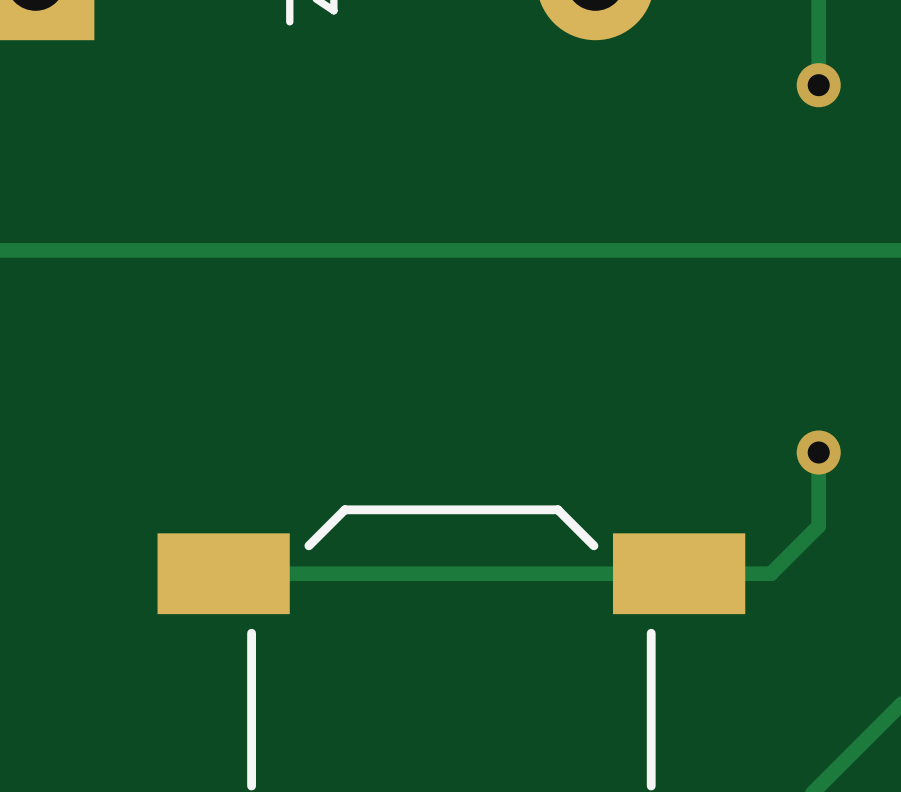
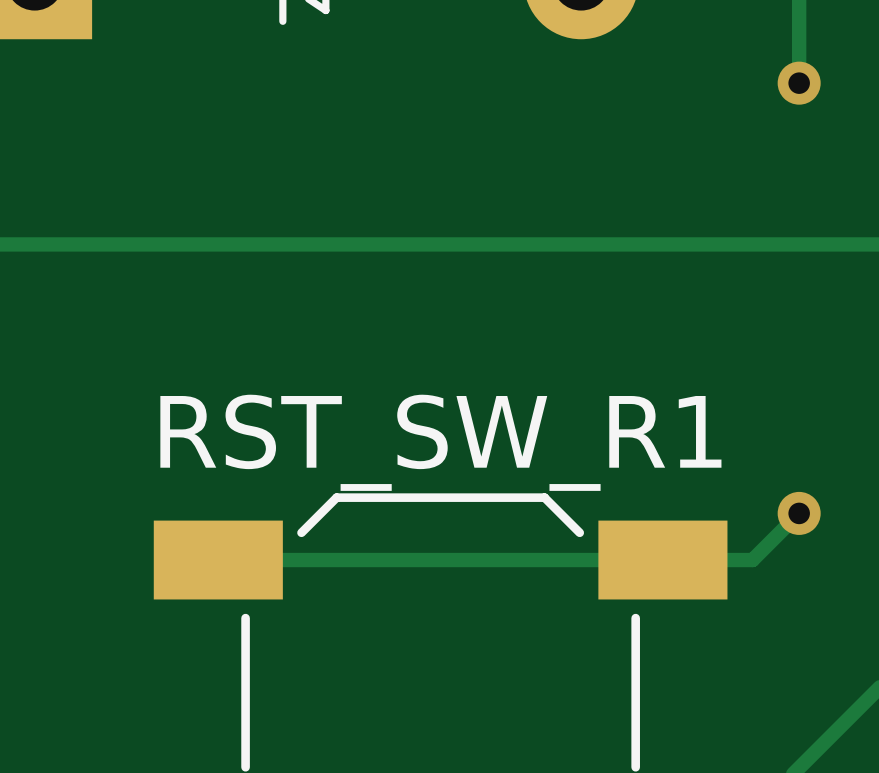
track: (818, 452) (818, 525) -> none
via position: (818, 452) -> (799, 513)
RST_SW_R1 name: none -> RST_SW_R1 (440, 442)

